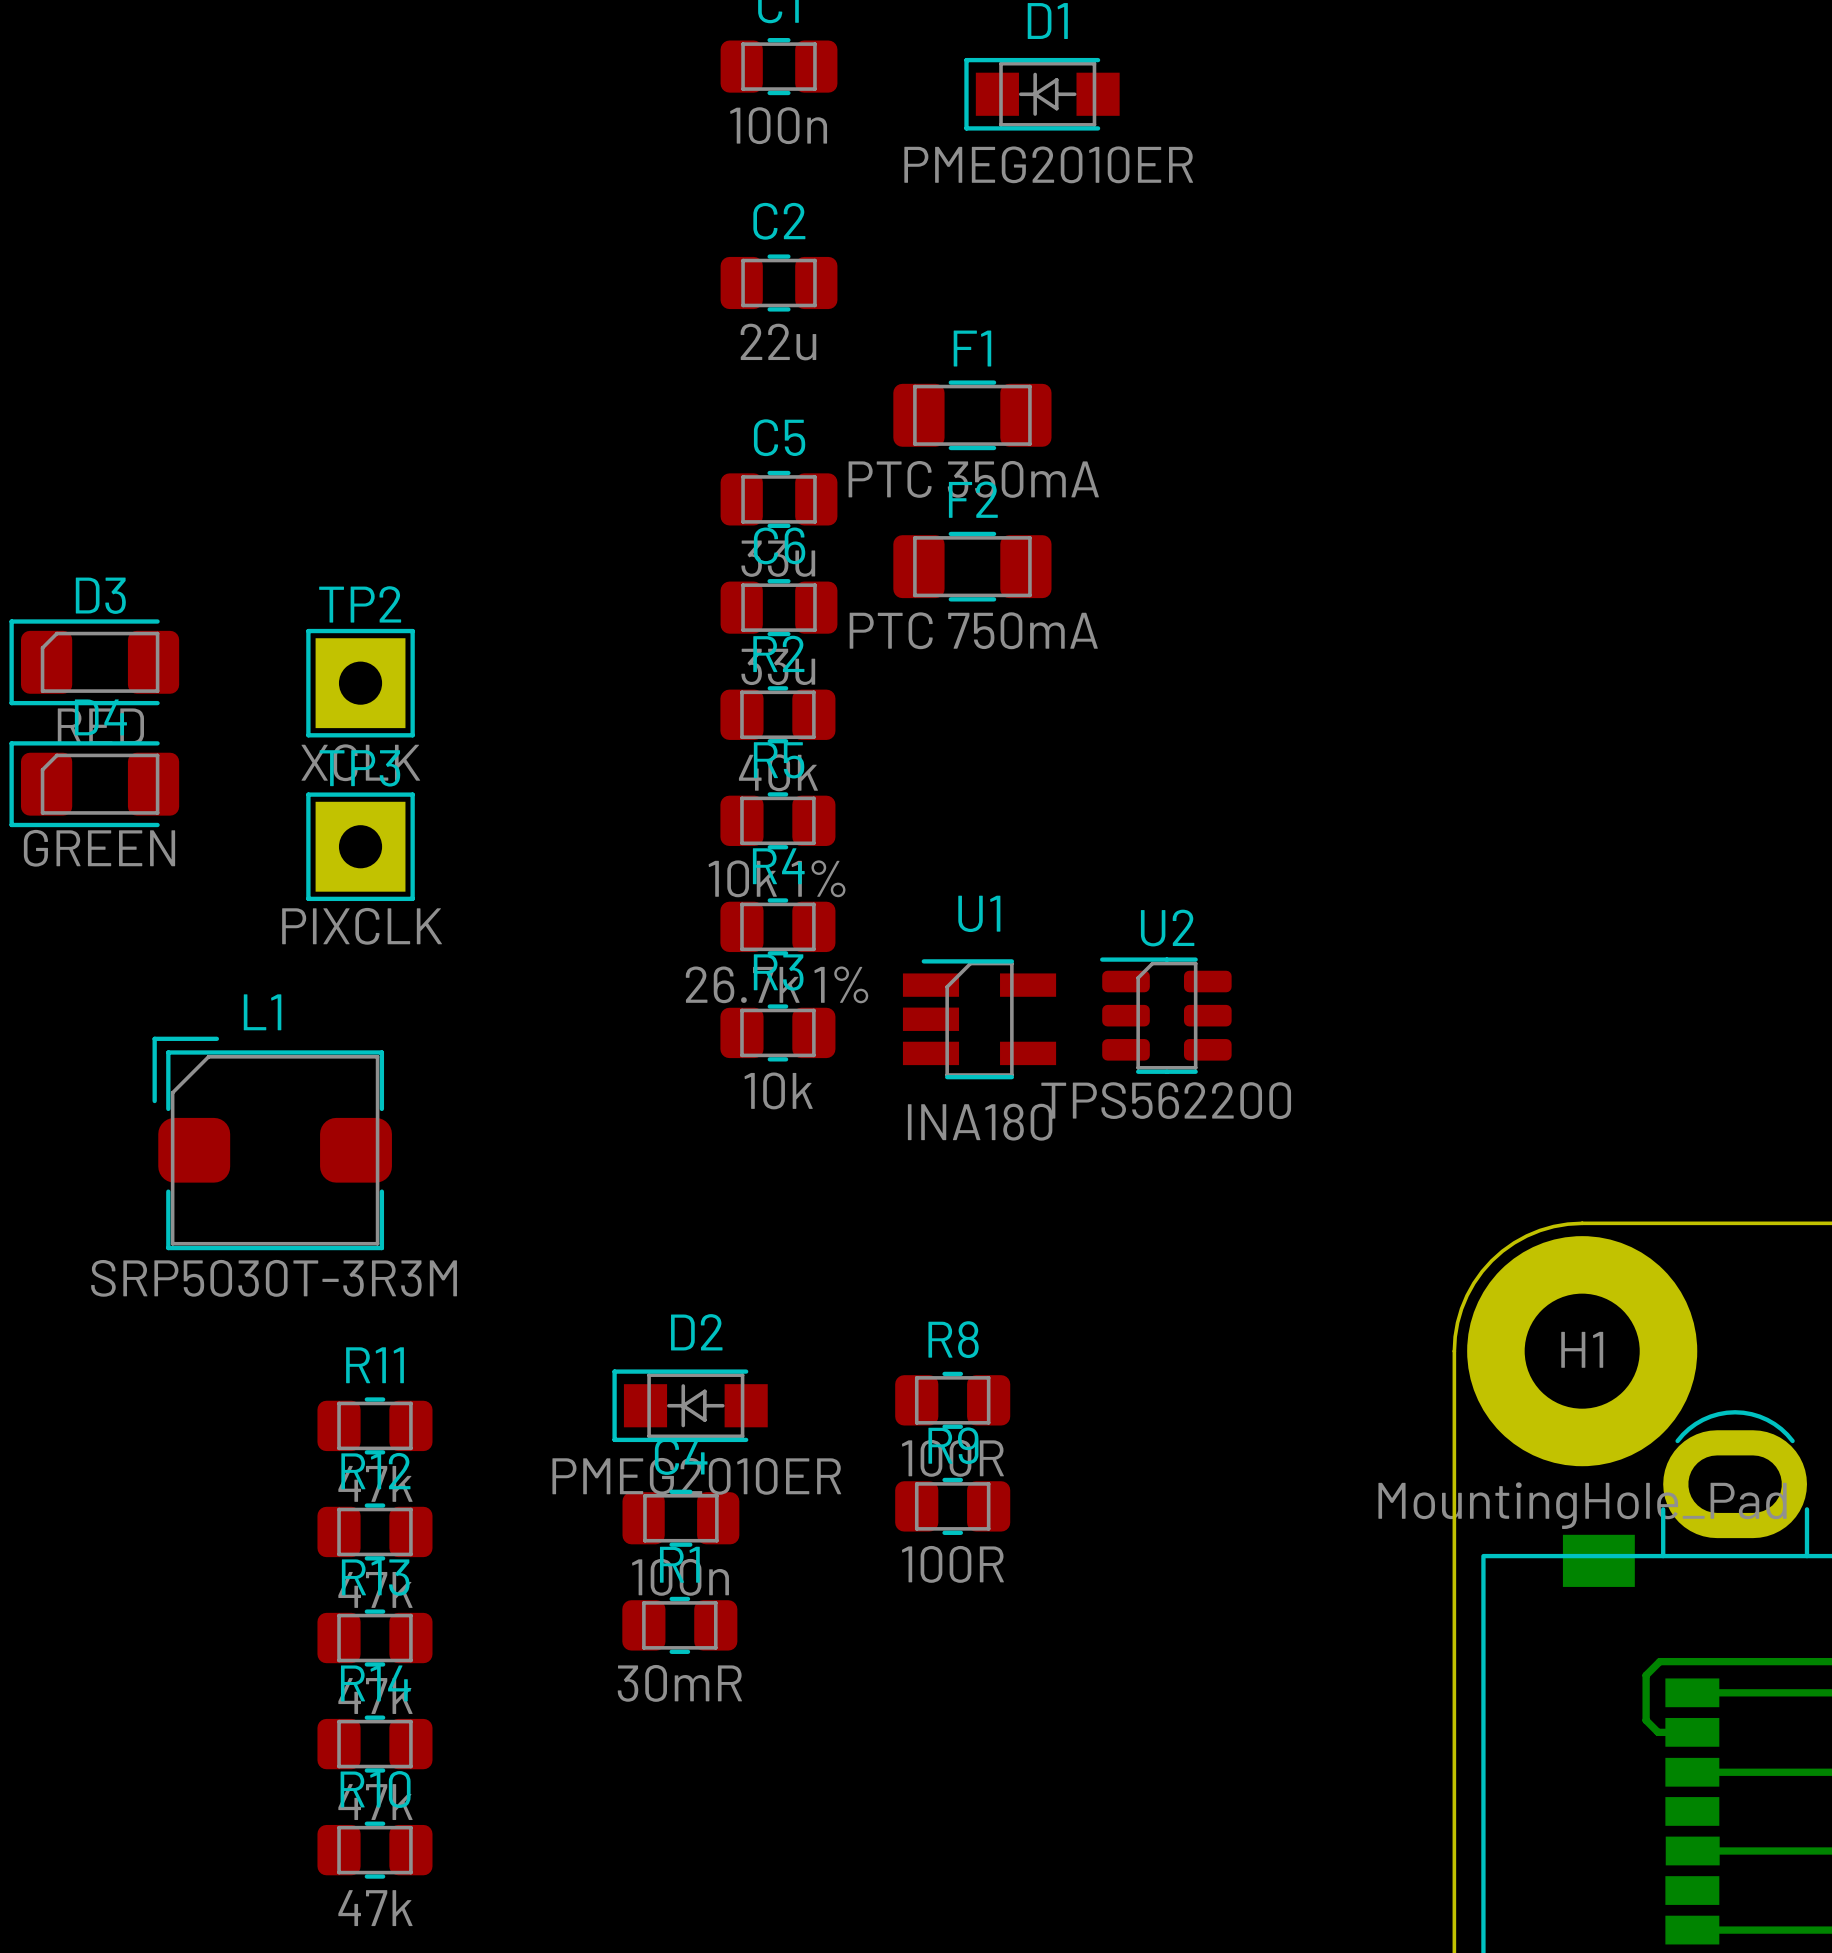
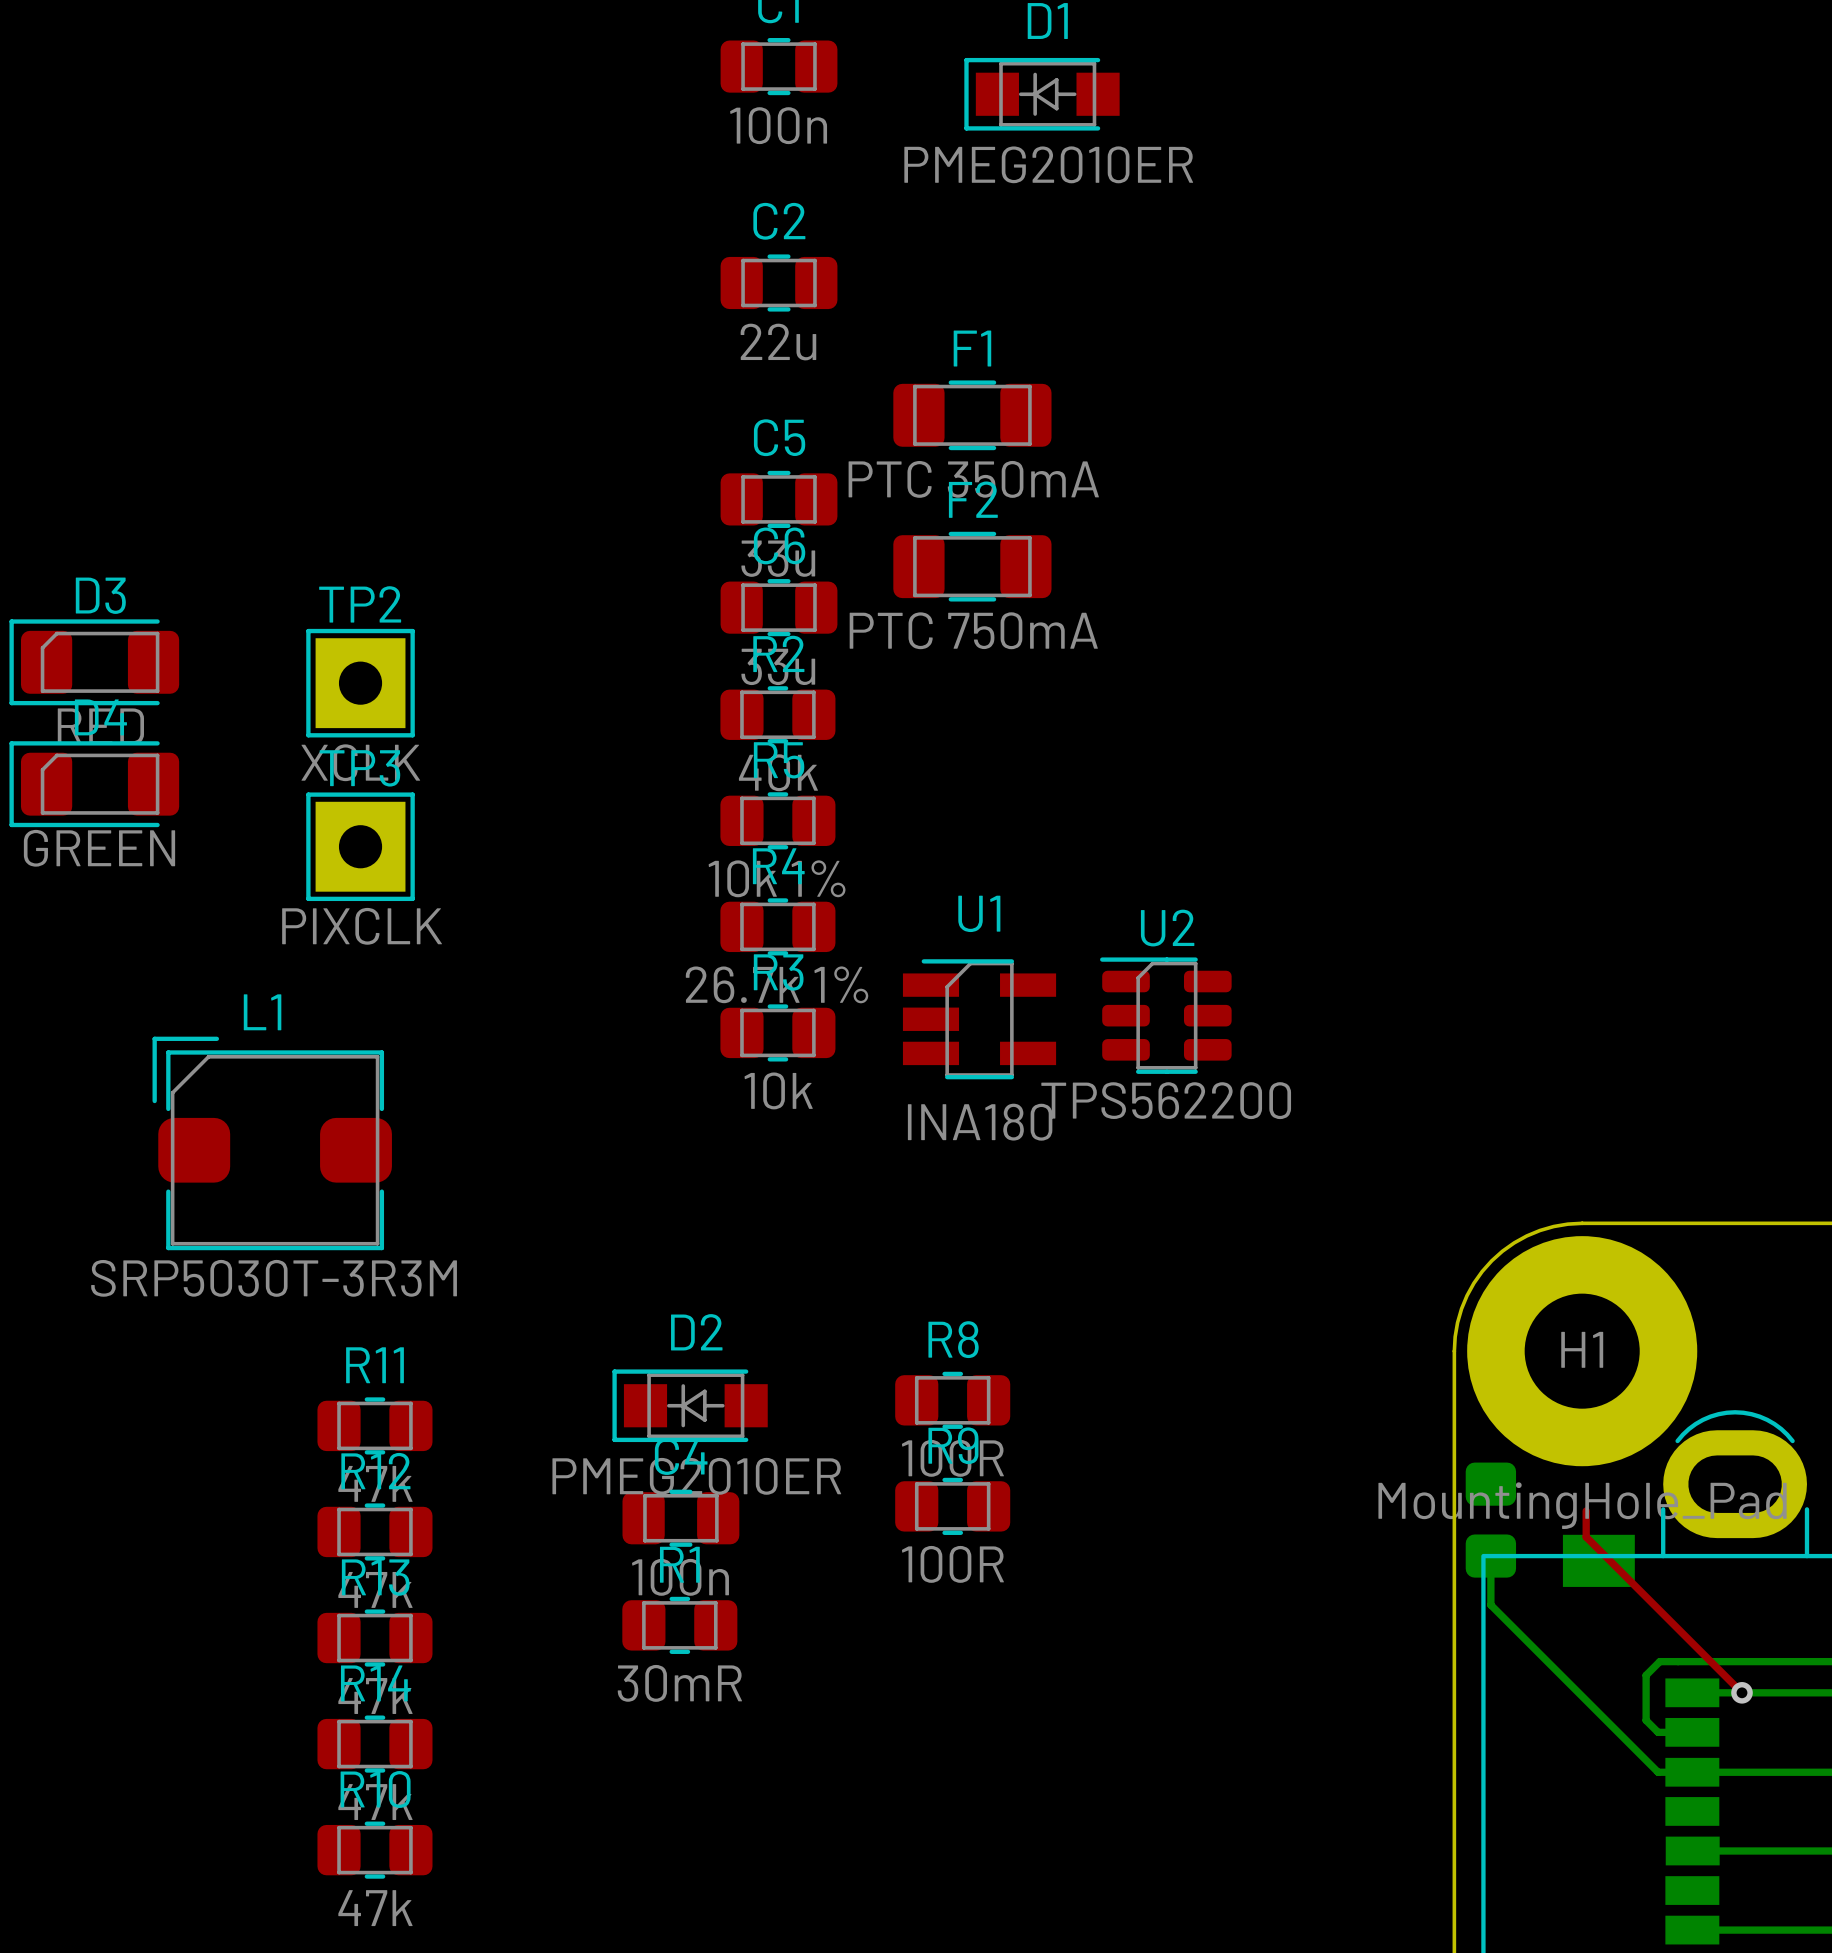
top track: none -> (1586, 1510) (1586, 1537) (1741, 1692)
part: none -> (1490, 1520)
bottom track: none -> (1490, 1556) (1490, 1605) (1658, 1772) (1692, 1772)
via: none -> (1741, 1692)

